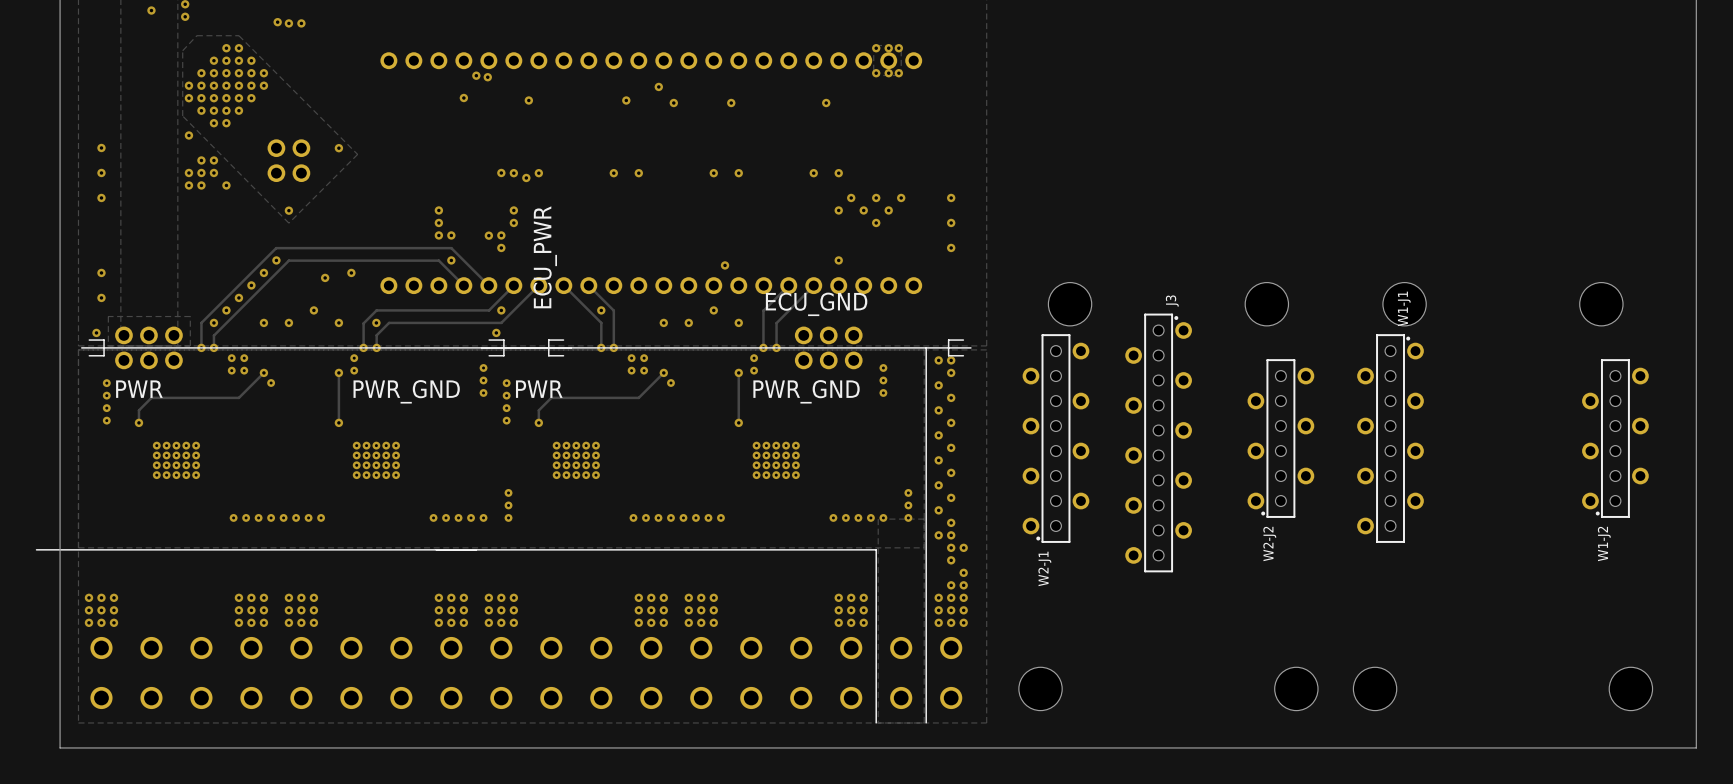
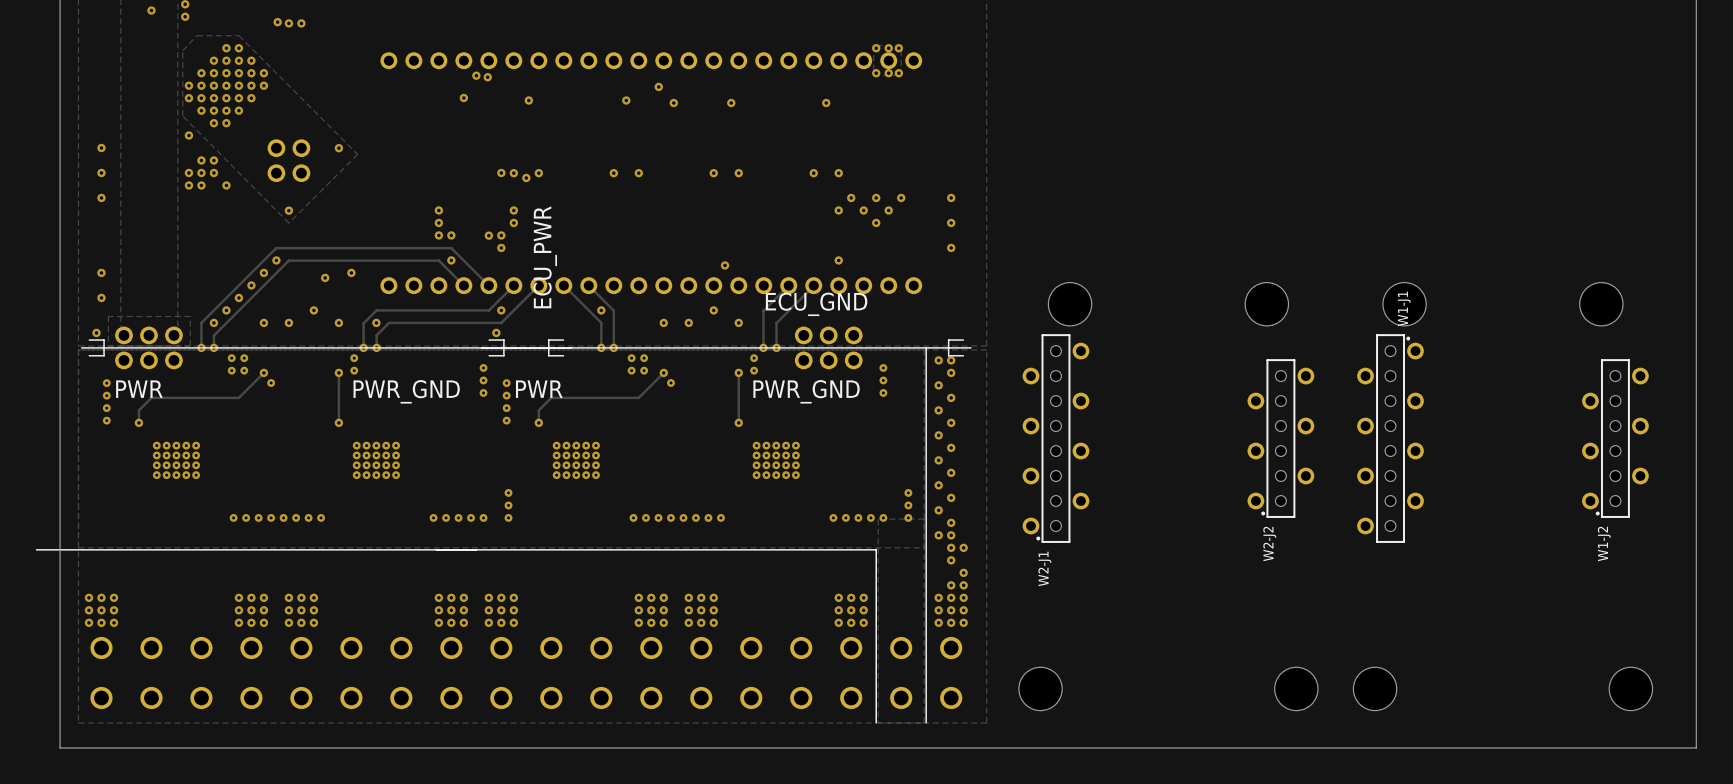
J3: (1158, 442) -> none

